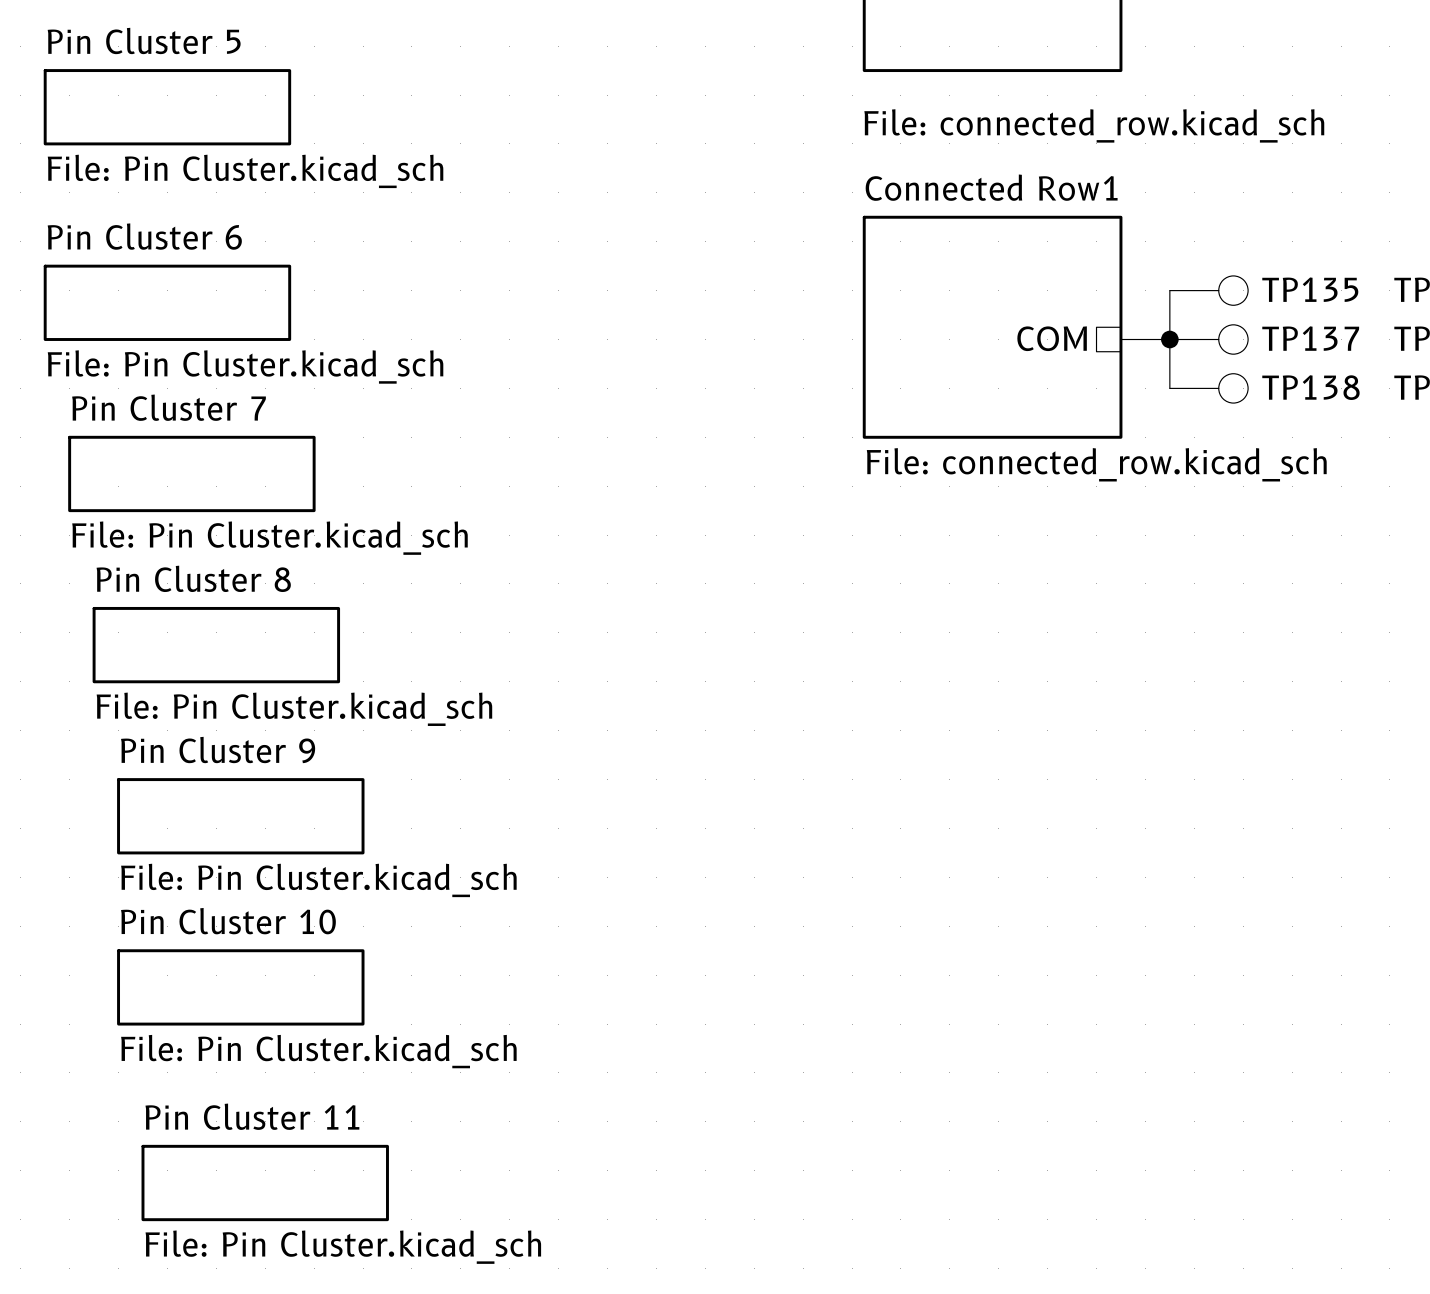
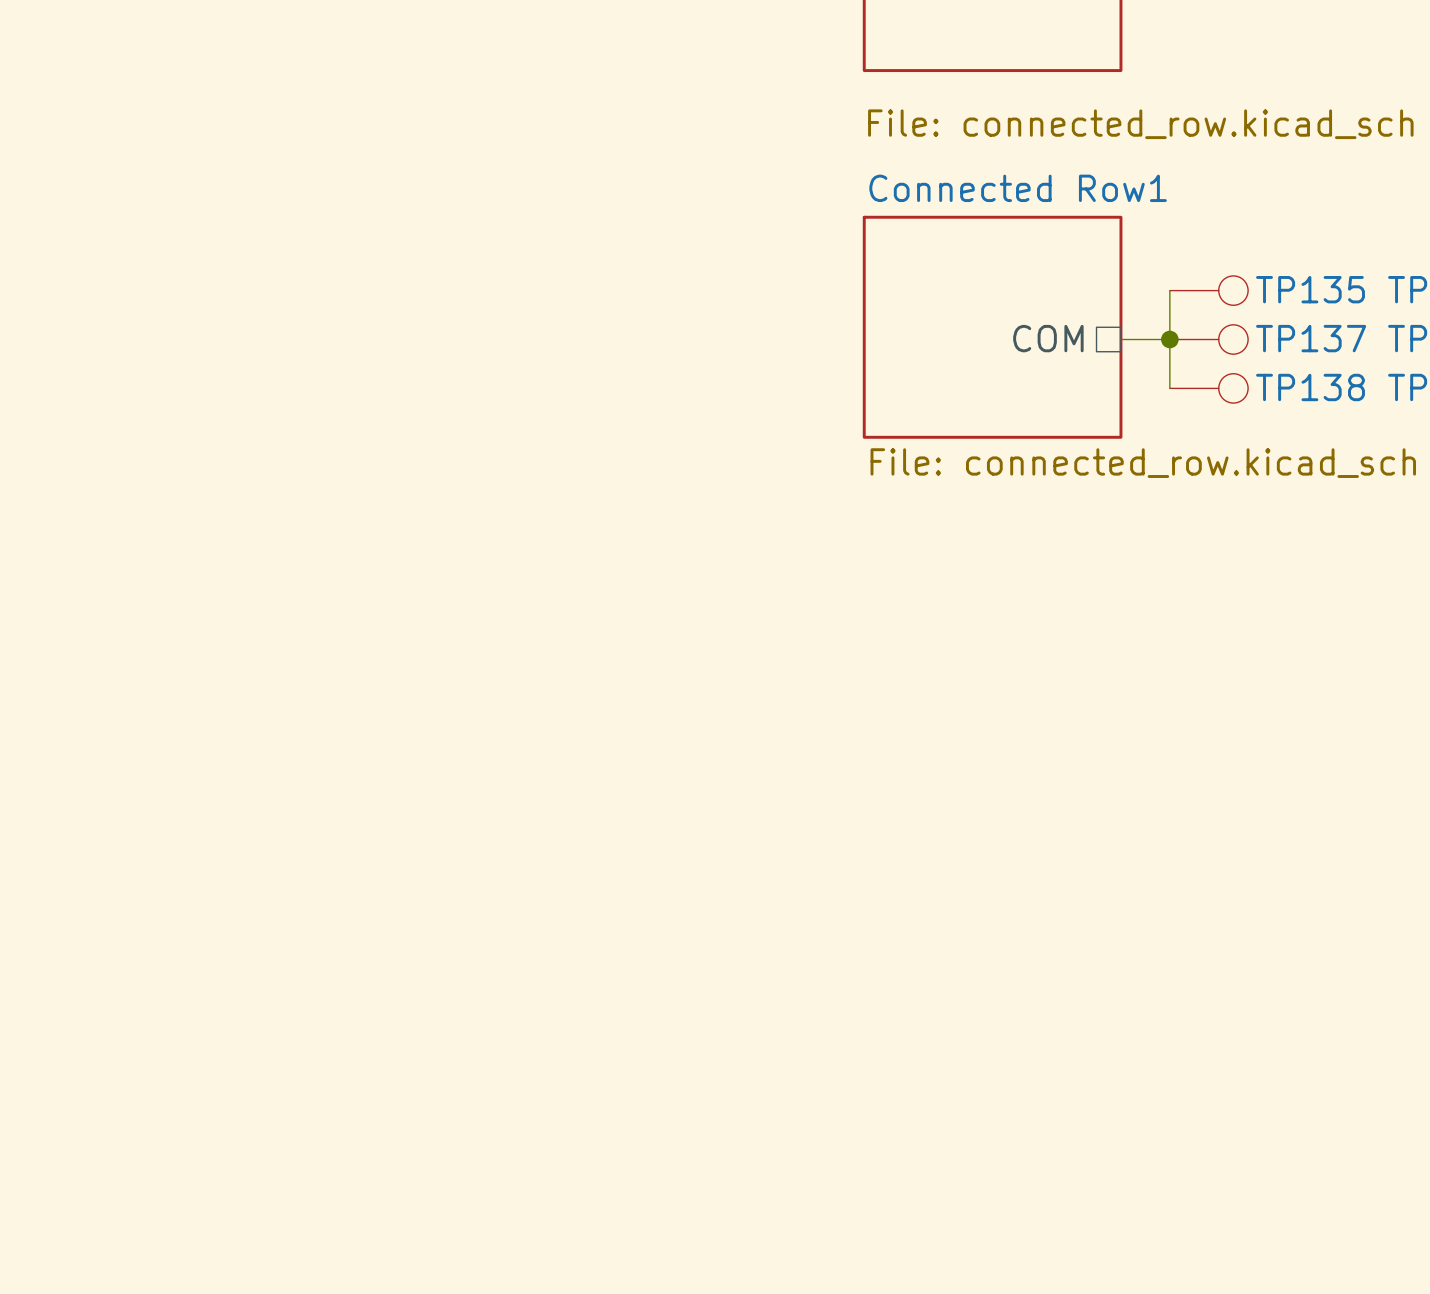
sheet Pin Cluster 5: File: Pin Cluster.kicad_sch (167, 107) -> none
sheet Pin Cluster 6: File: Pin Cluster.kicad_sch (167, 302) -> none
sheet Pin Cluster 7: File: Pin Cluster.kicad_sch (191, 473) -> none
sheet Pin Cluster 8: File: Pin Cluster.kicad_sch (216, 645) -> none
sheet Pin Cluster 9: File: Pin Cluster.kicad_sch (240, 816) -> none
sheet Pin Cluster 10: File: Pin Cluster.kicad_sch (240, 987) -> none
sheet Pin Cluster 11: File: Pin Cluster.kicad_sch (265, 1183) -> none

